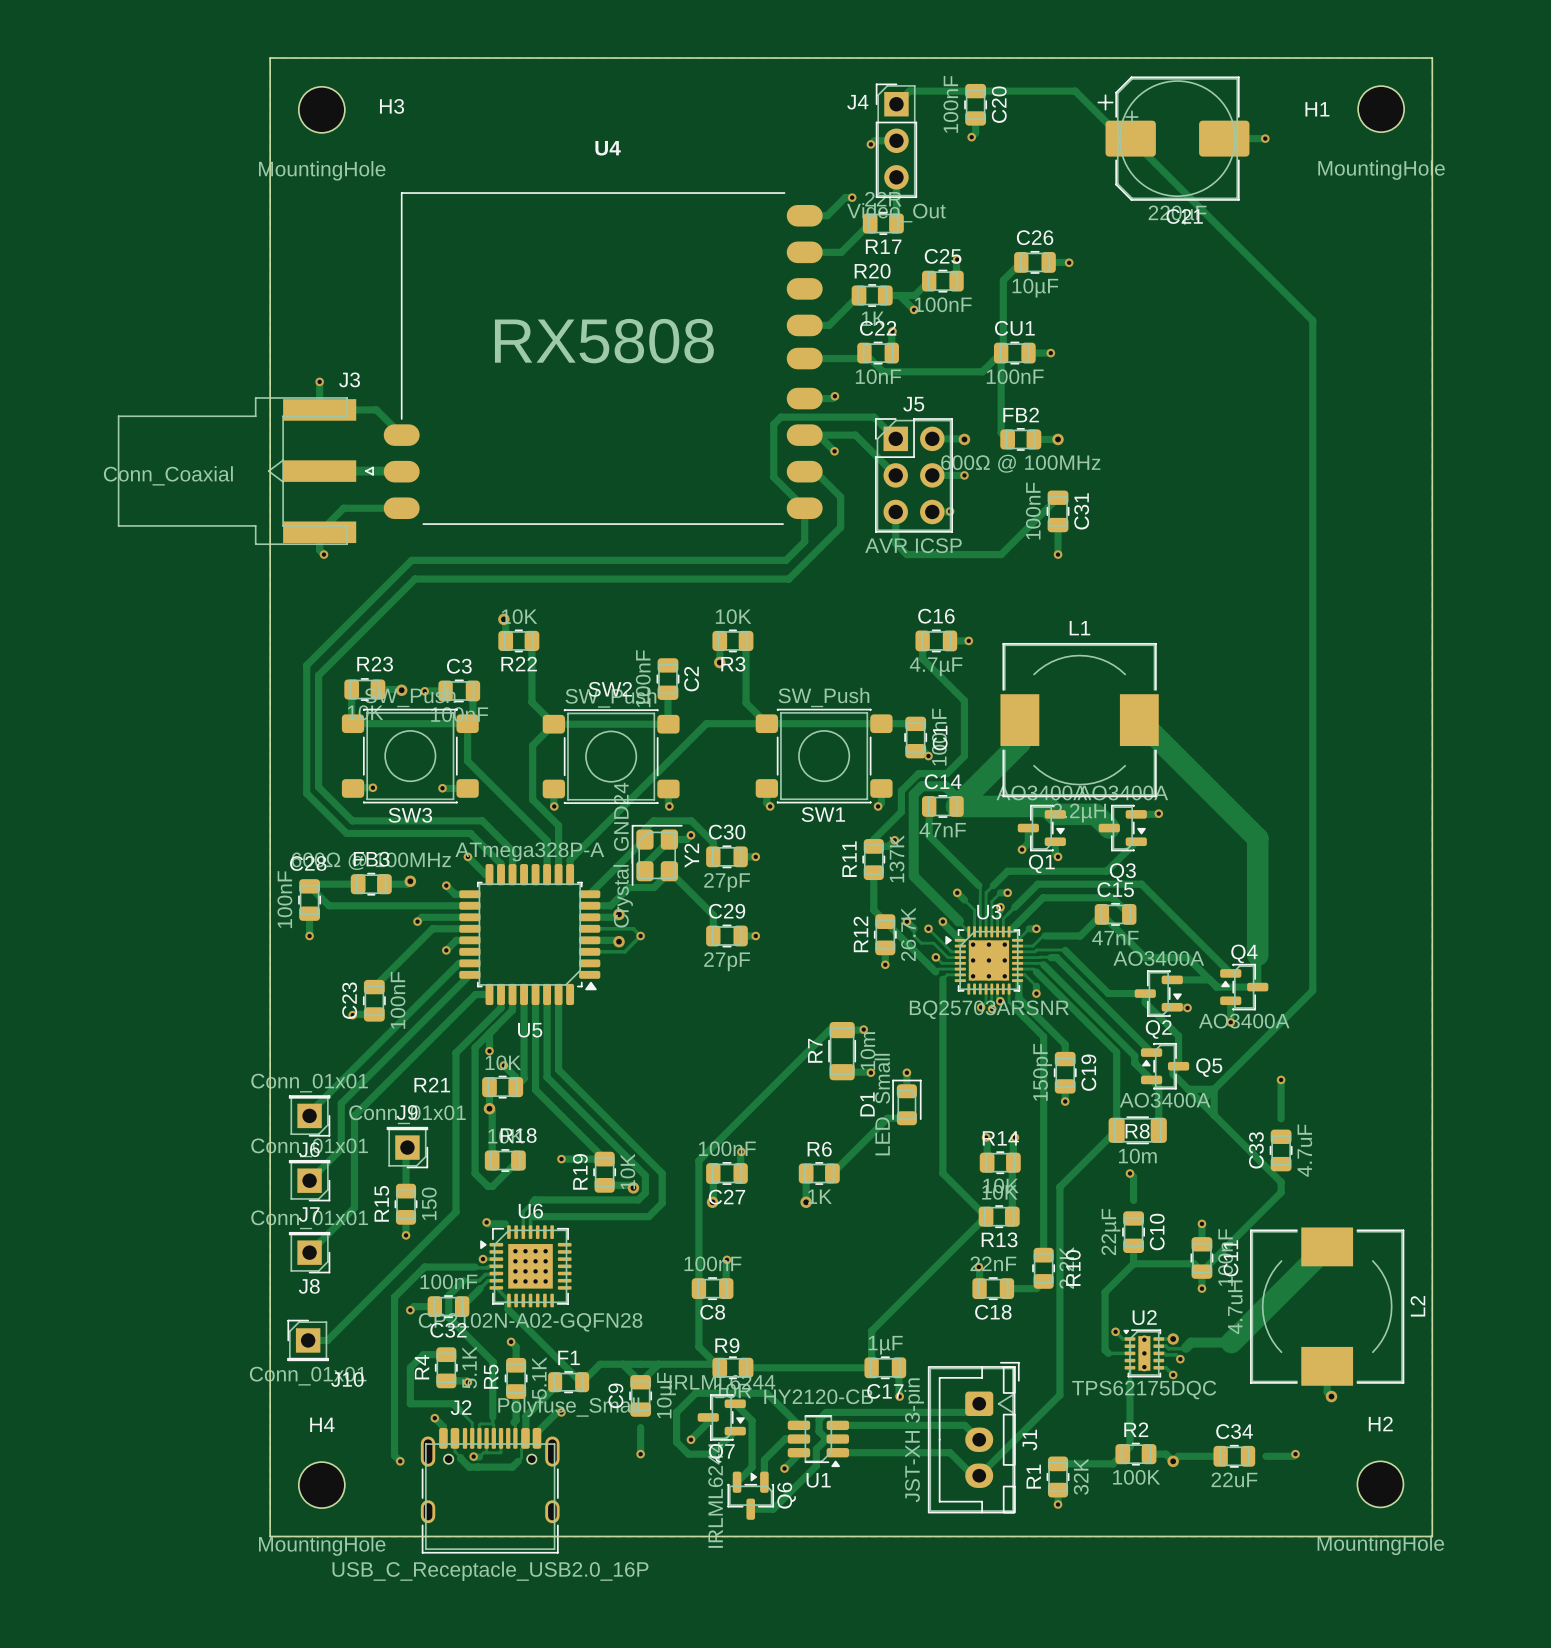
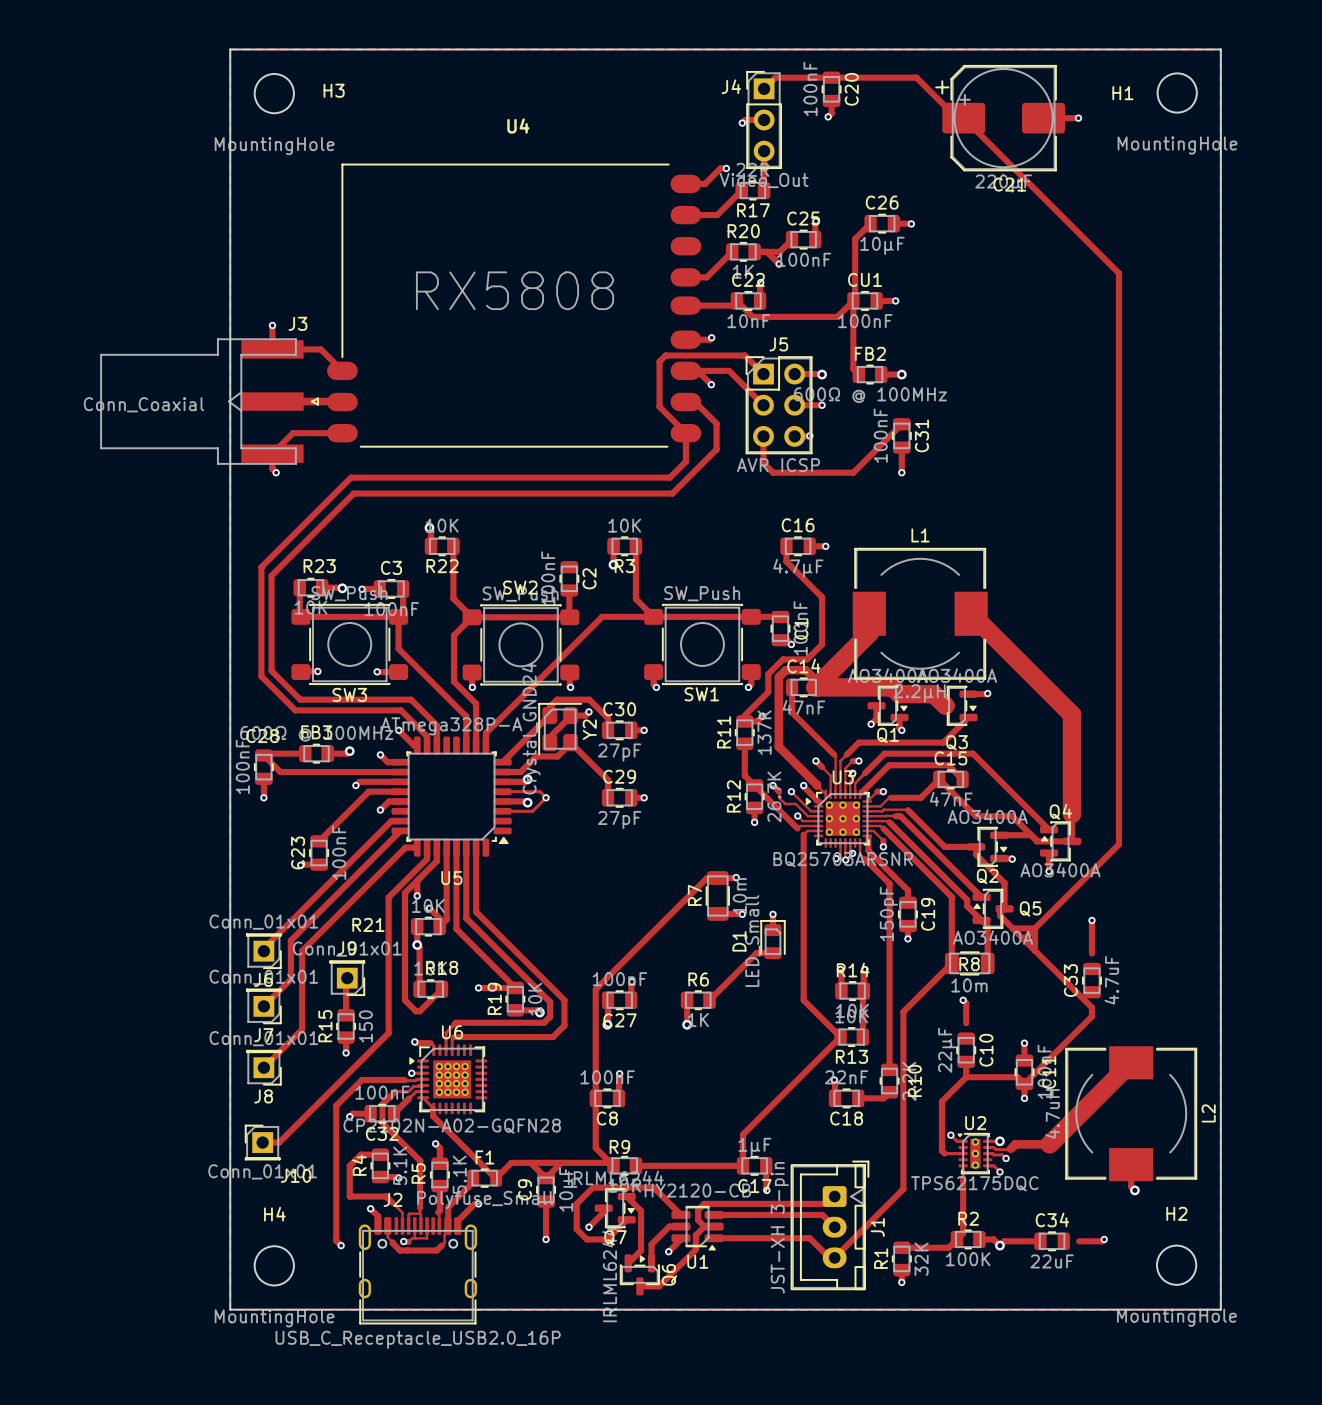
track: none -> (546, 1201) (546, 1216)

